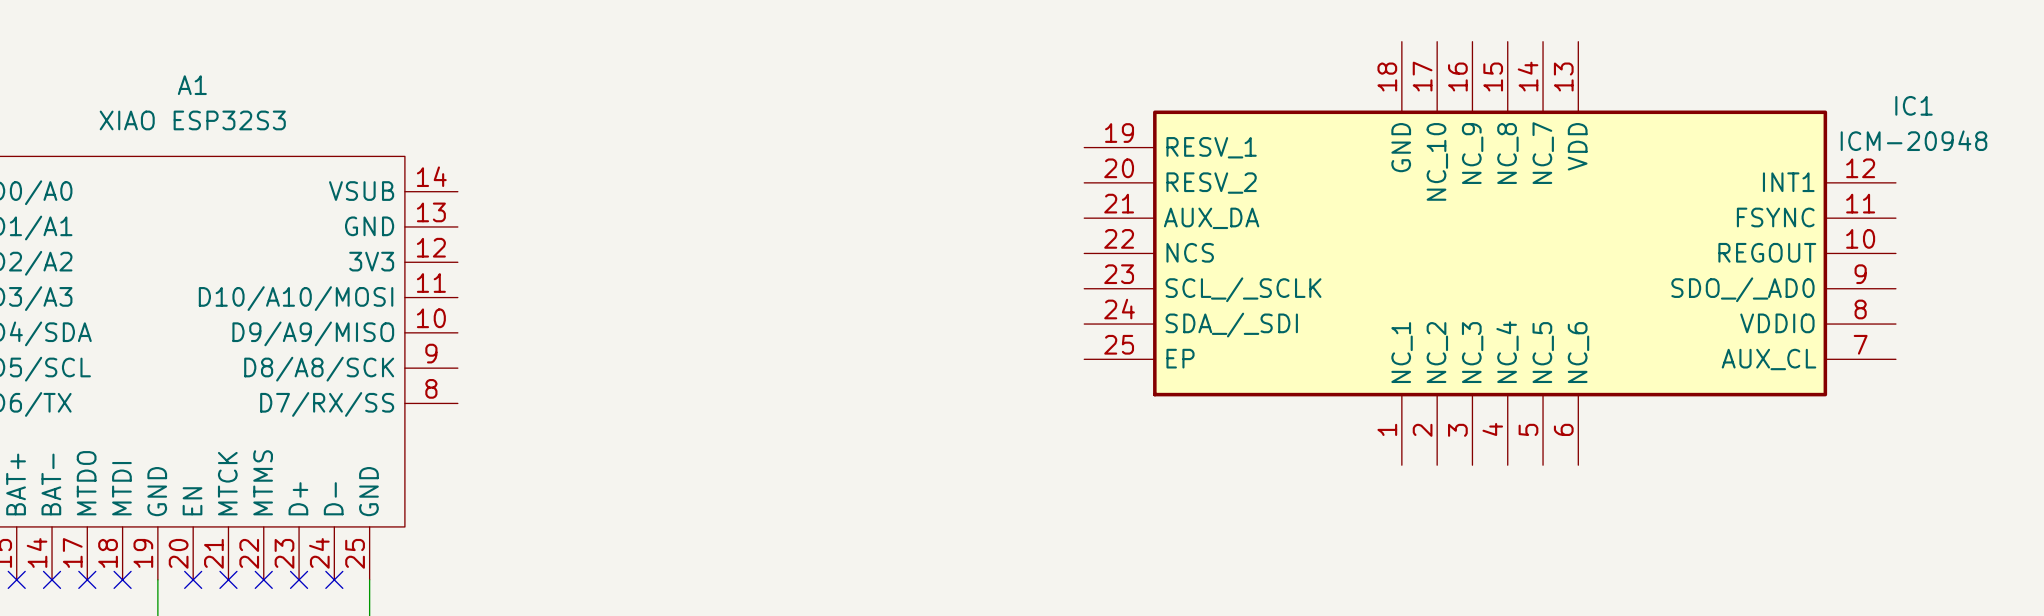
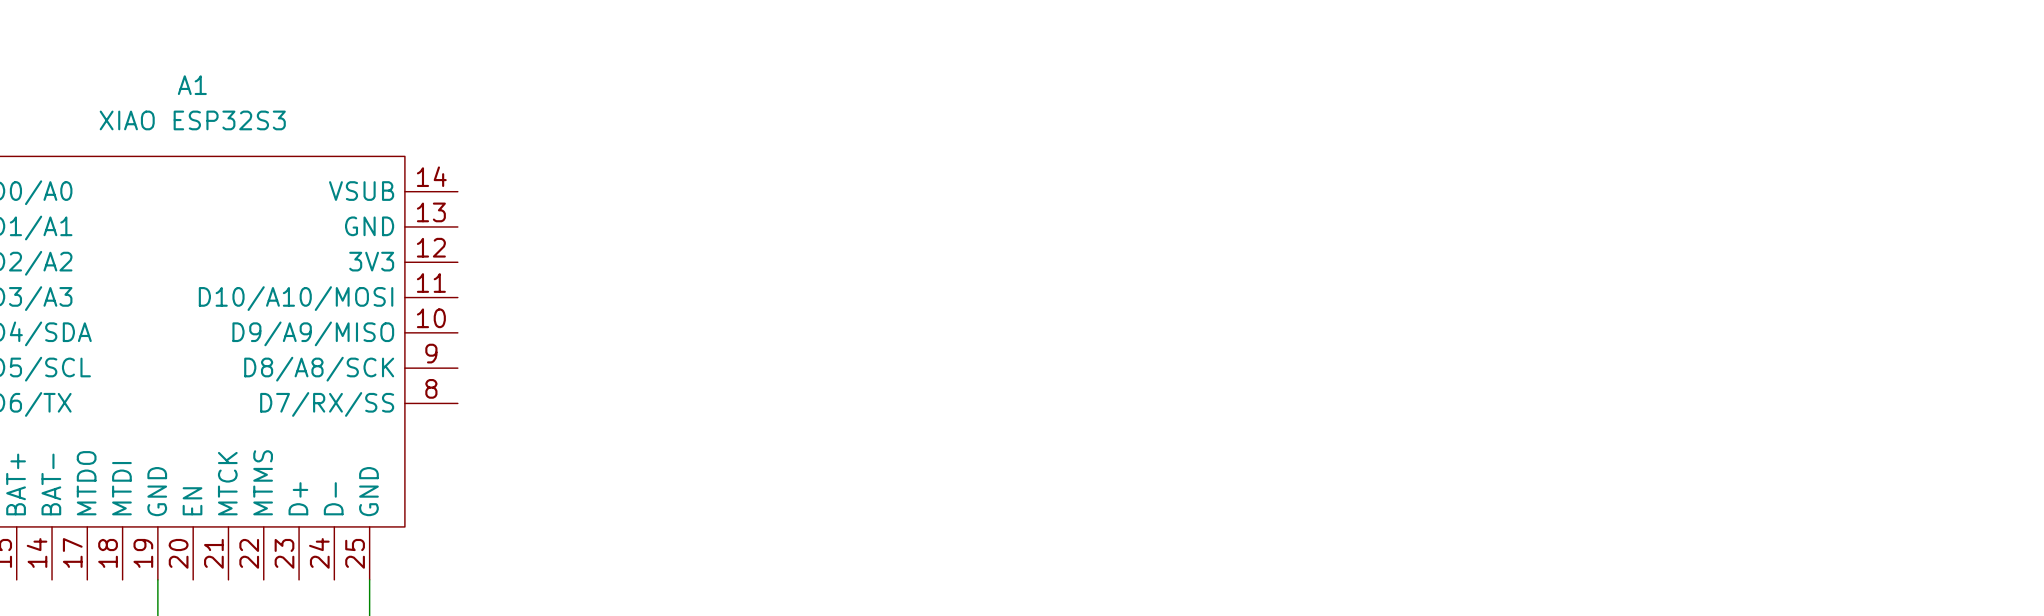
IC1: ICM-20948 (1490, 253) -> none
no-connect mark: (16, 579) -> none
no-connect mark: (52, 579) -> none
no-connect mark: (87, 579) -> none
no-connect mark: (122, 579) -> none
no-connect mark: (193, 579) -> none
no-connect mark: (228, 579) -> none
no-connect mark: (263, 579) -> none
no-connect mark: (299, 579) -> none
no-connect mark: (334, 579) -> none

